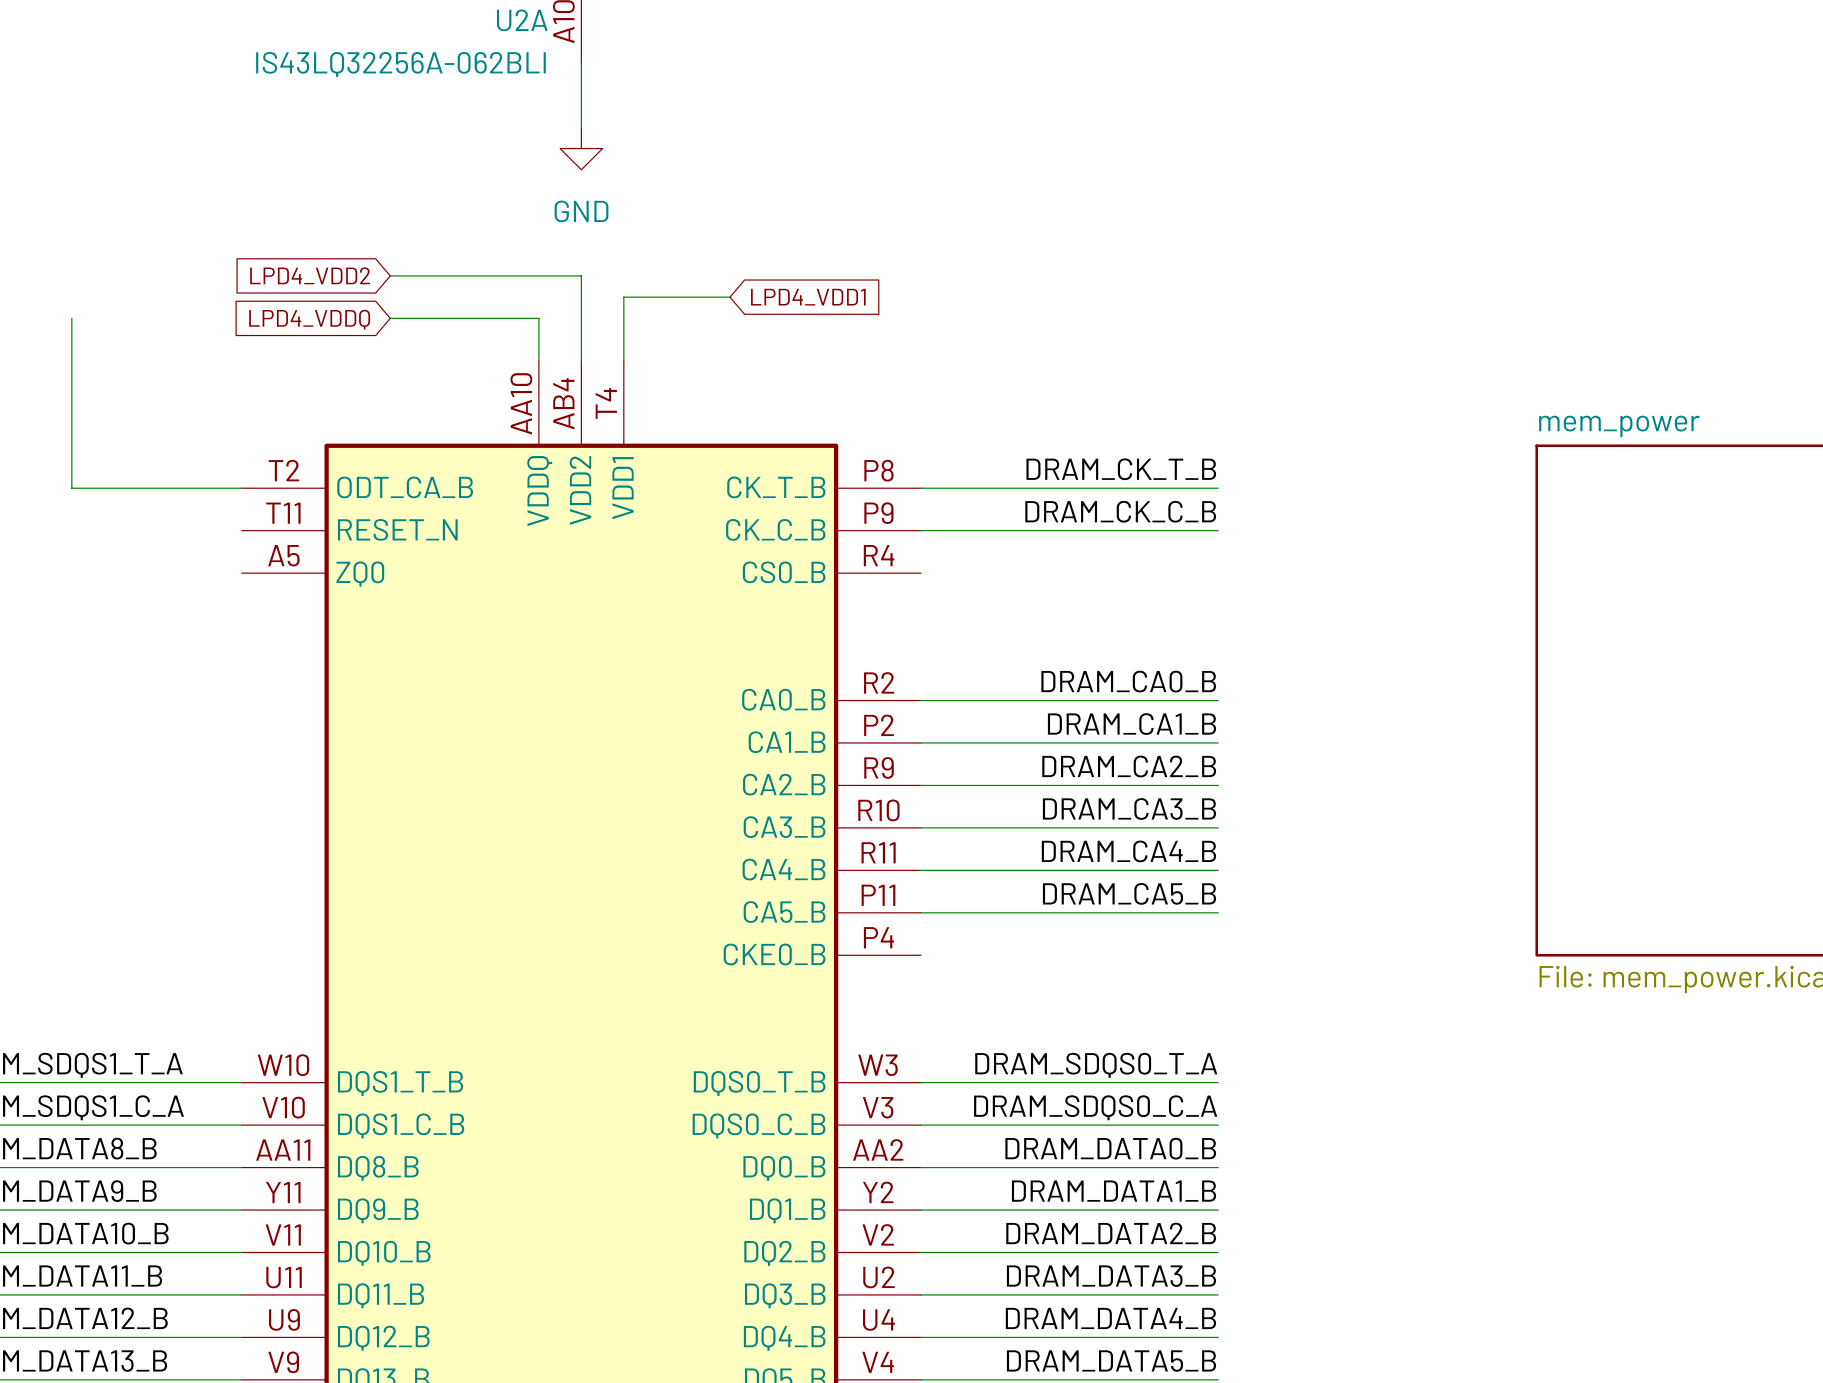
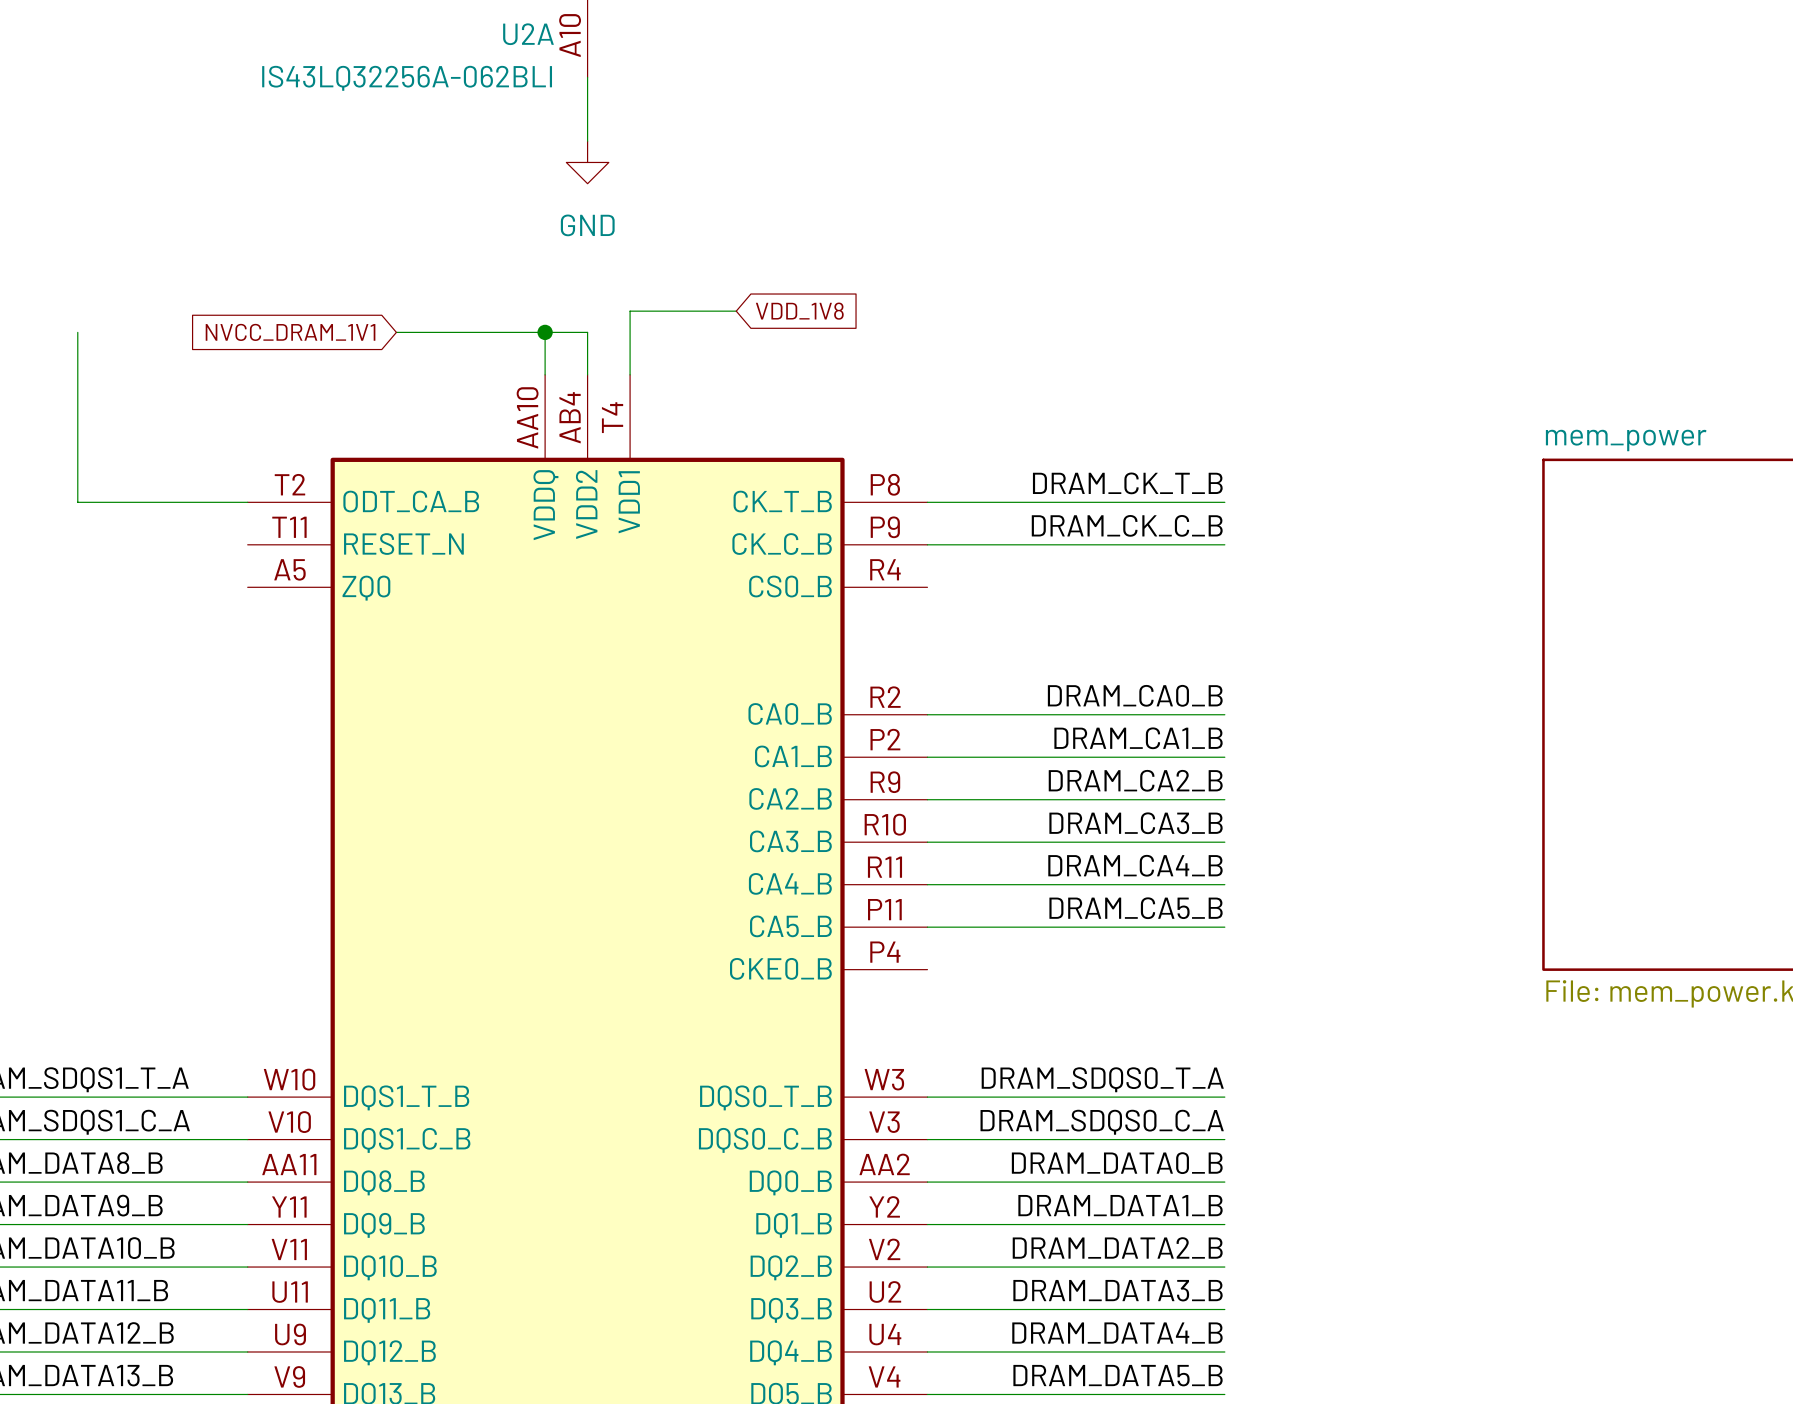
global label: LPD4_VDD2 (310, 275) -> none
wire: (390, 275) (581, 275) (581, 318) -> (545, 332) (587, 332)
global label: LPD4_VDD1 (808, 297) -> VDD_1V8 (799, 311)
junction: none -> (545, 332)
global label: LPD4_VDDQ (309, 319) -> NVCC_DRAM_1V1 (290, 332)

